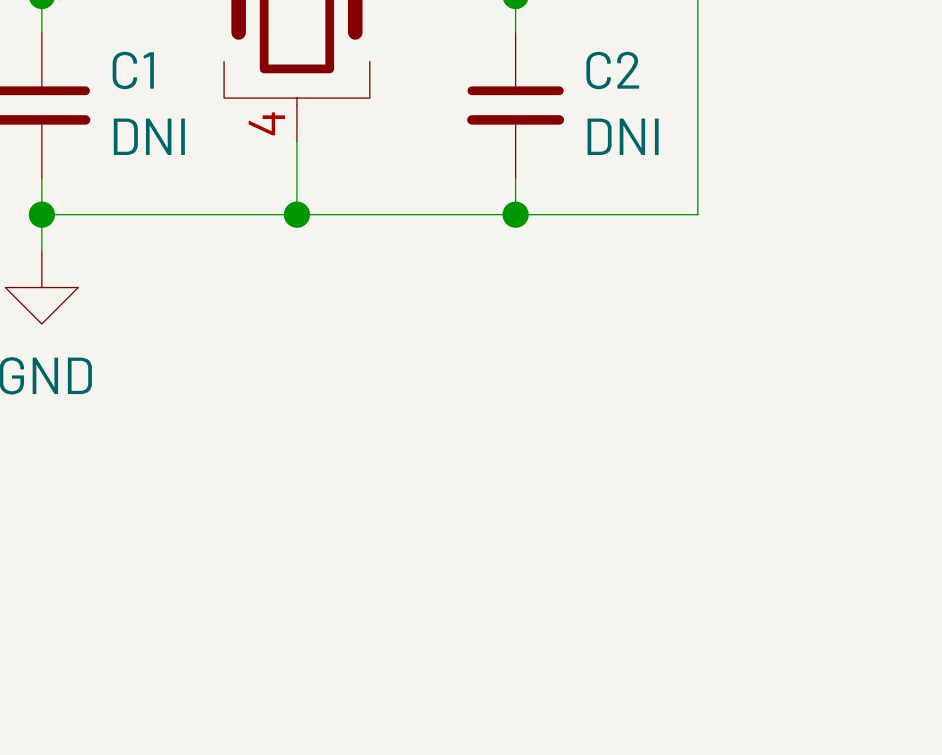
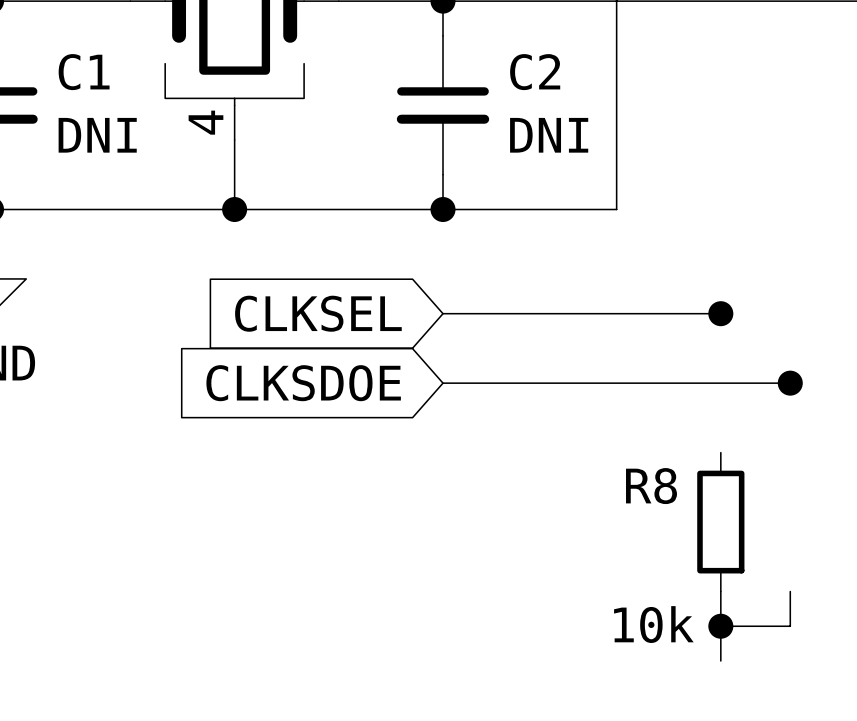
wire: none -> (443, 313) (720, 313)
junction: none -> (720, 313)
global label: none -> CLKSEL (318, 313)
global label: none -> CLKSDOE (303, 383)
wire: none -> (443, 383) (790, 383)
junction: none -> (790, 383)
R8: none -> 10k (720, 522)
wire: none -> (720, 591) (720, 660)
wire: none -> (790, 591) (790, 626) (720, 626)
junction: none -> (720, 626)

